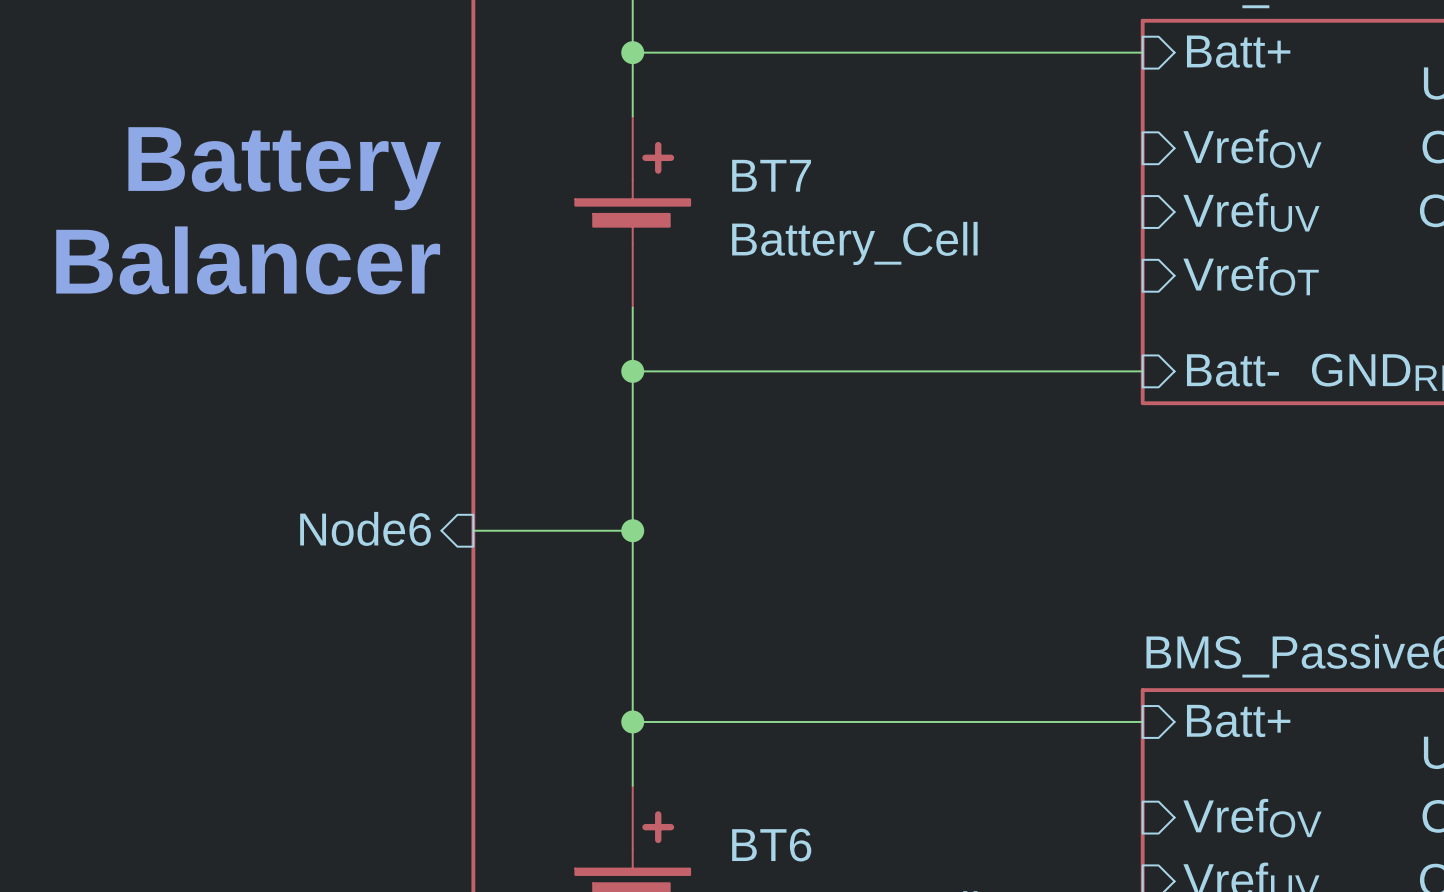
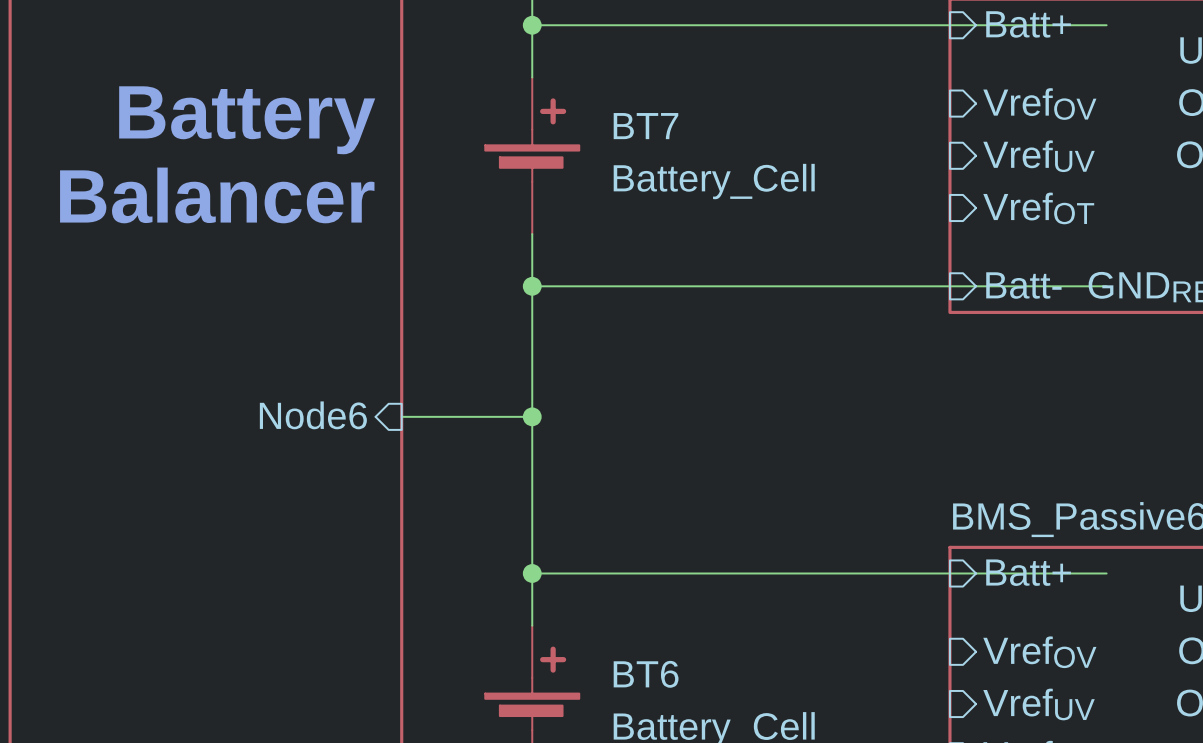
wire: none -> (949, 25) (1106, 25)
wire: none -> (949, 286) (1106, 286)
wire: none -> (949, 573) (1106, 573)

